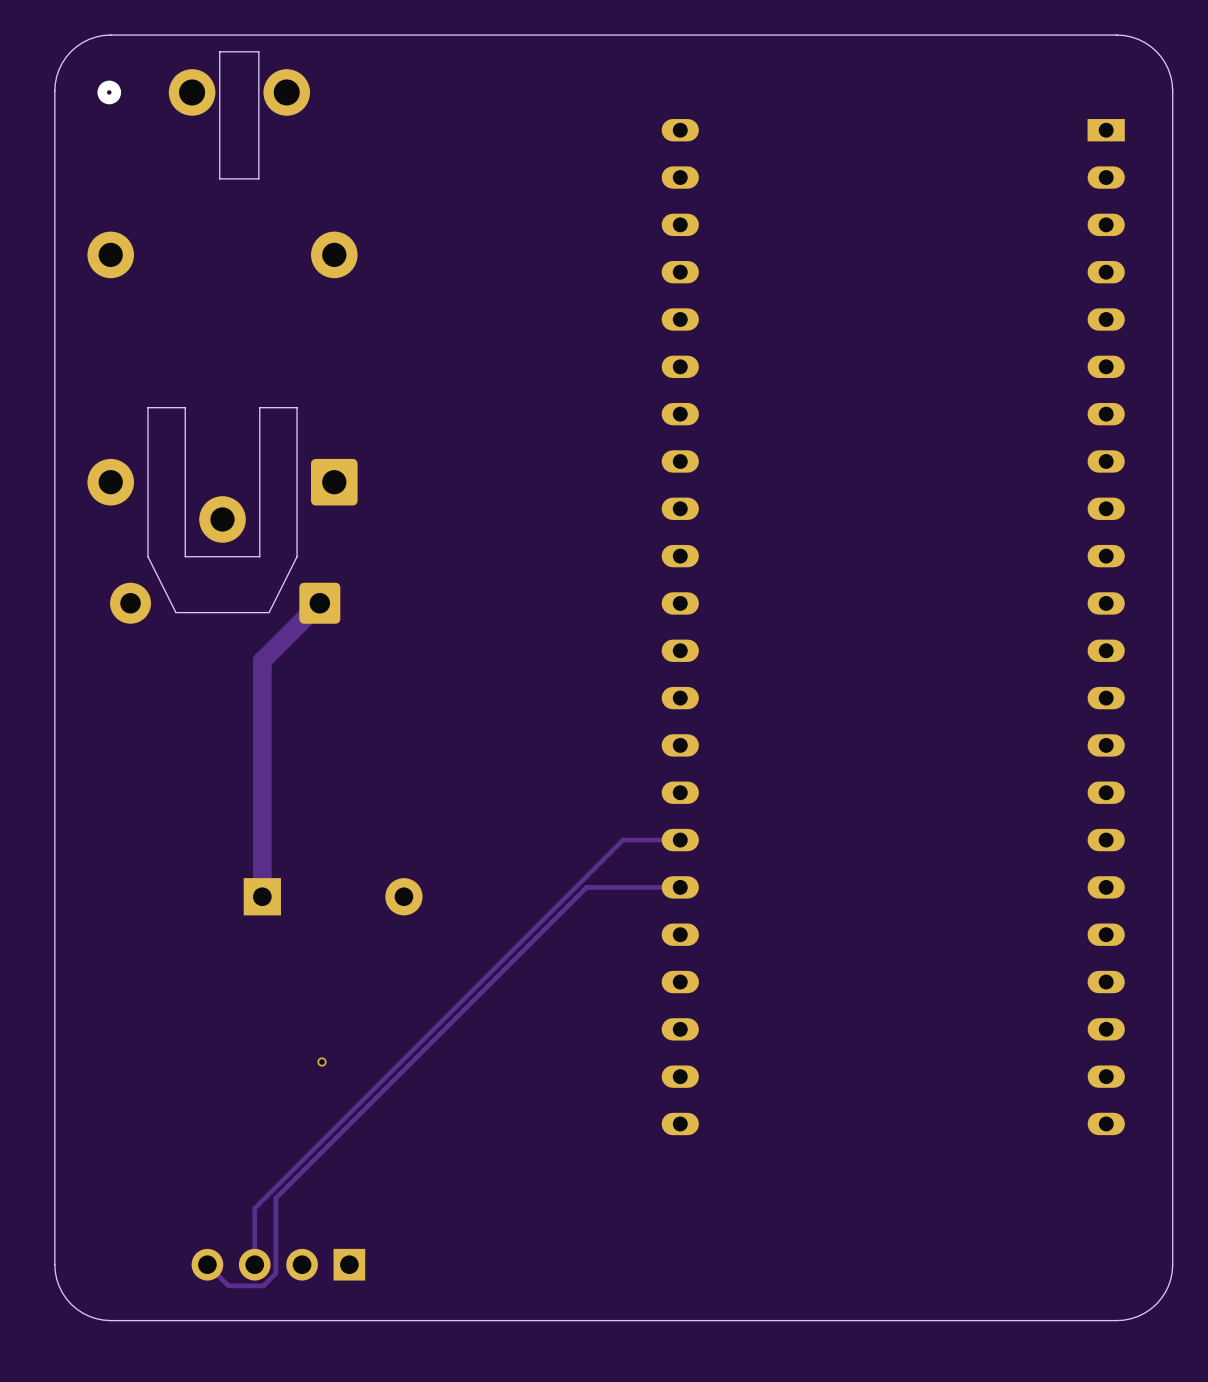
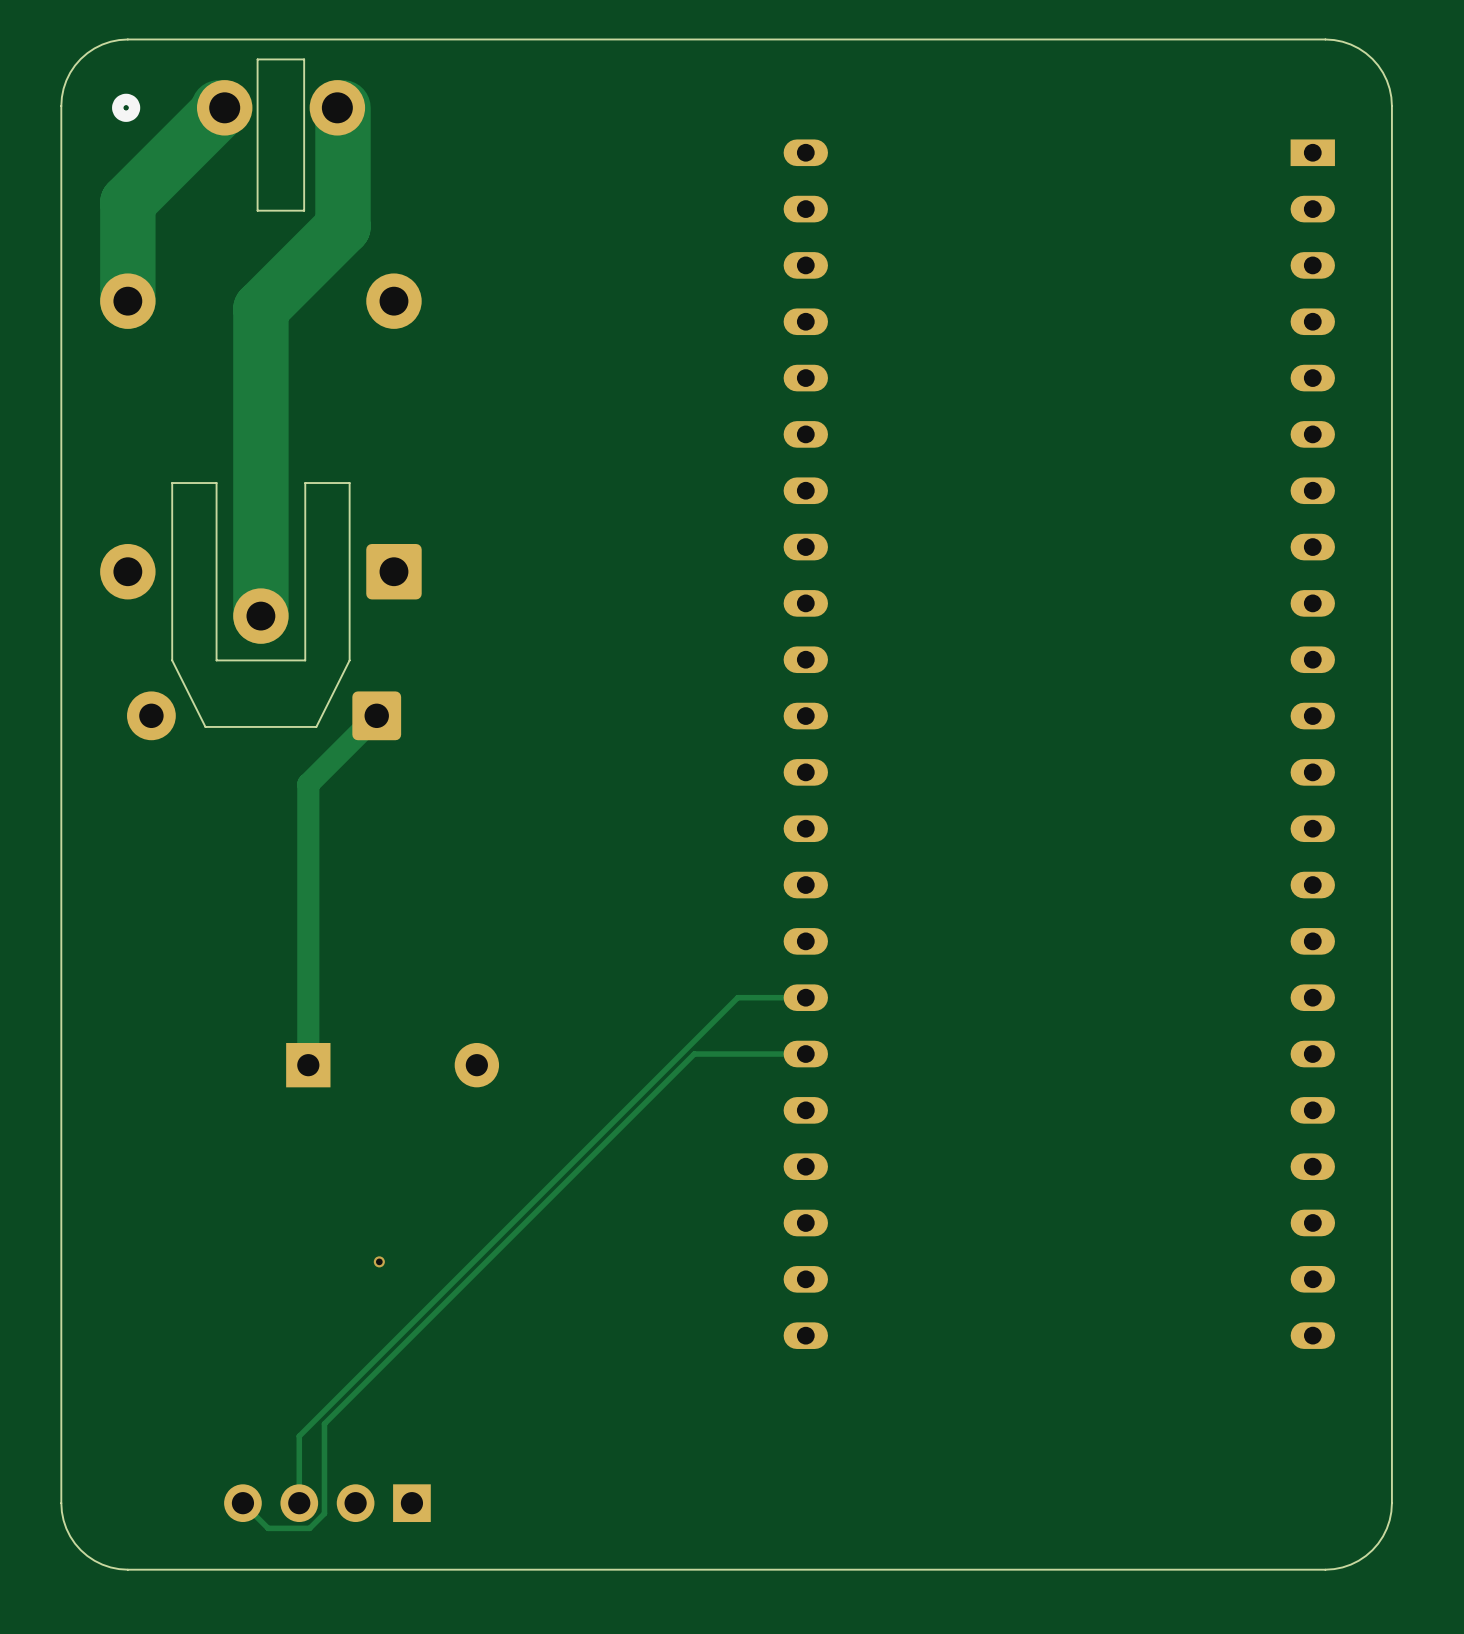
track: none -> (218, 107) (218, 111) (127, 202) (127, 301)
track: none -> (342, 107) (342, 226) (260, 308) (260, 616)

